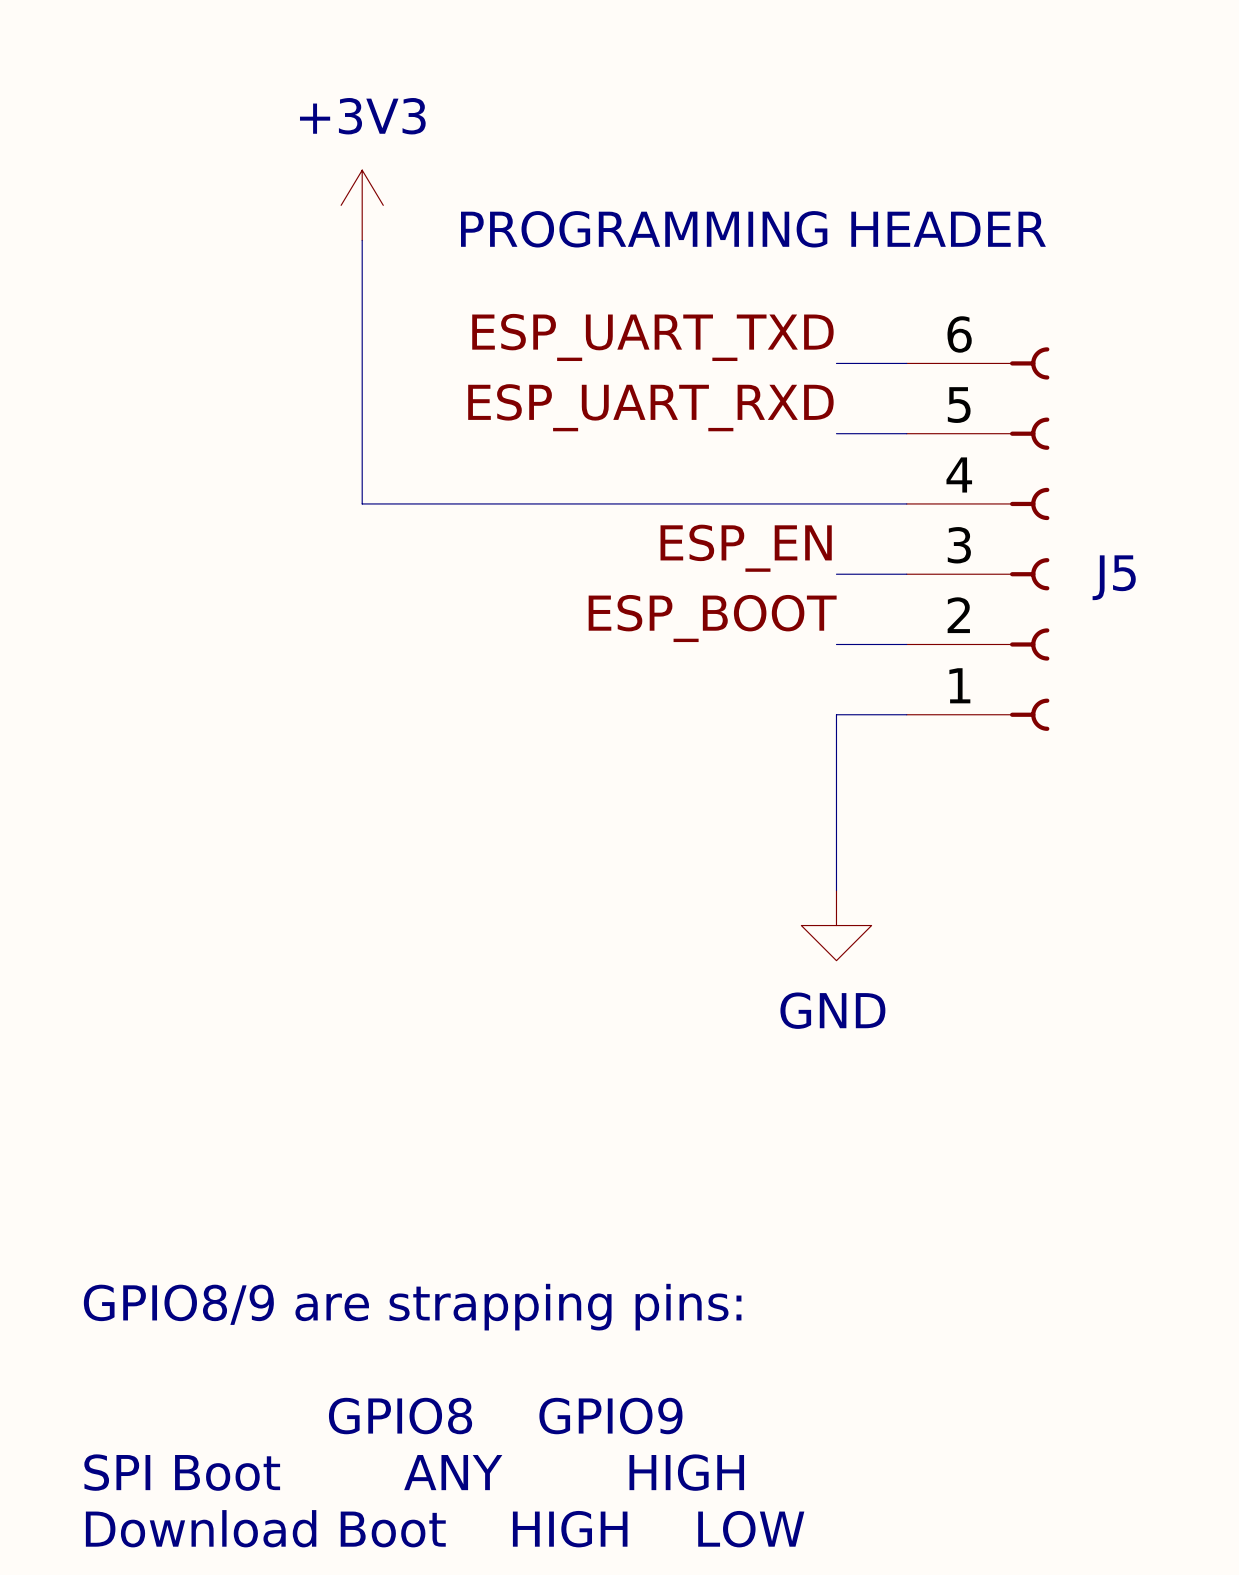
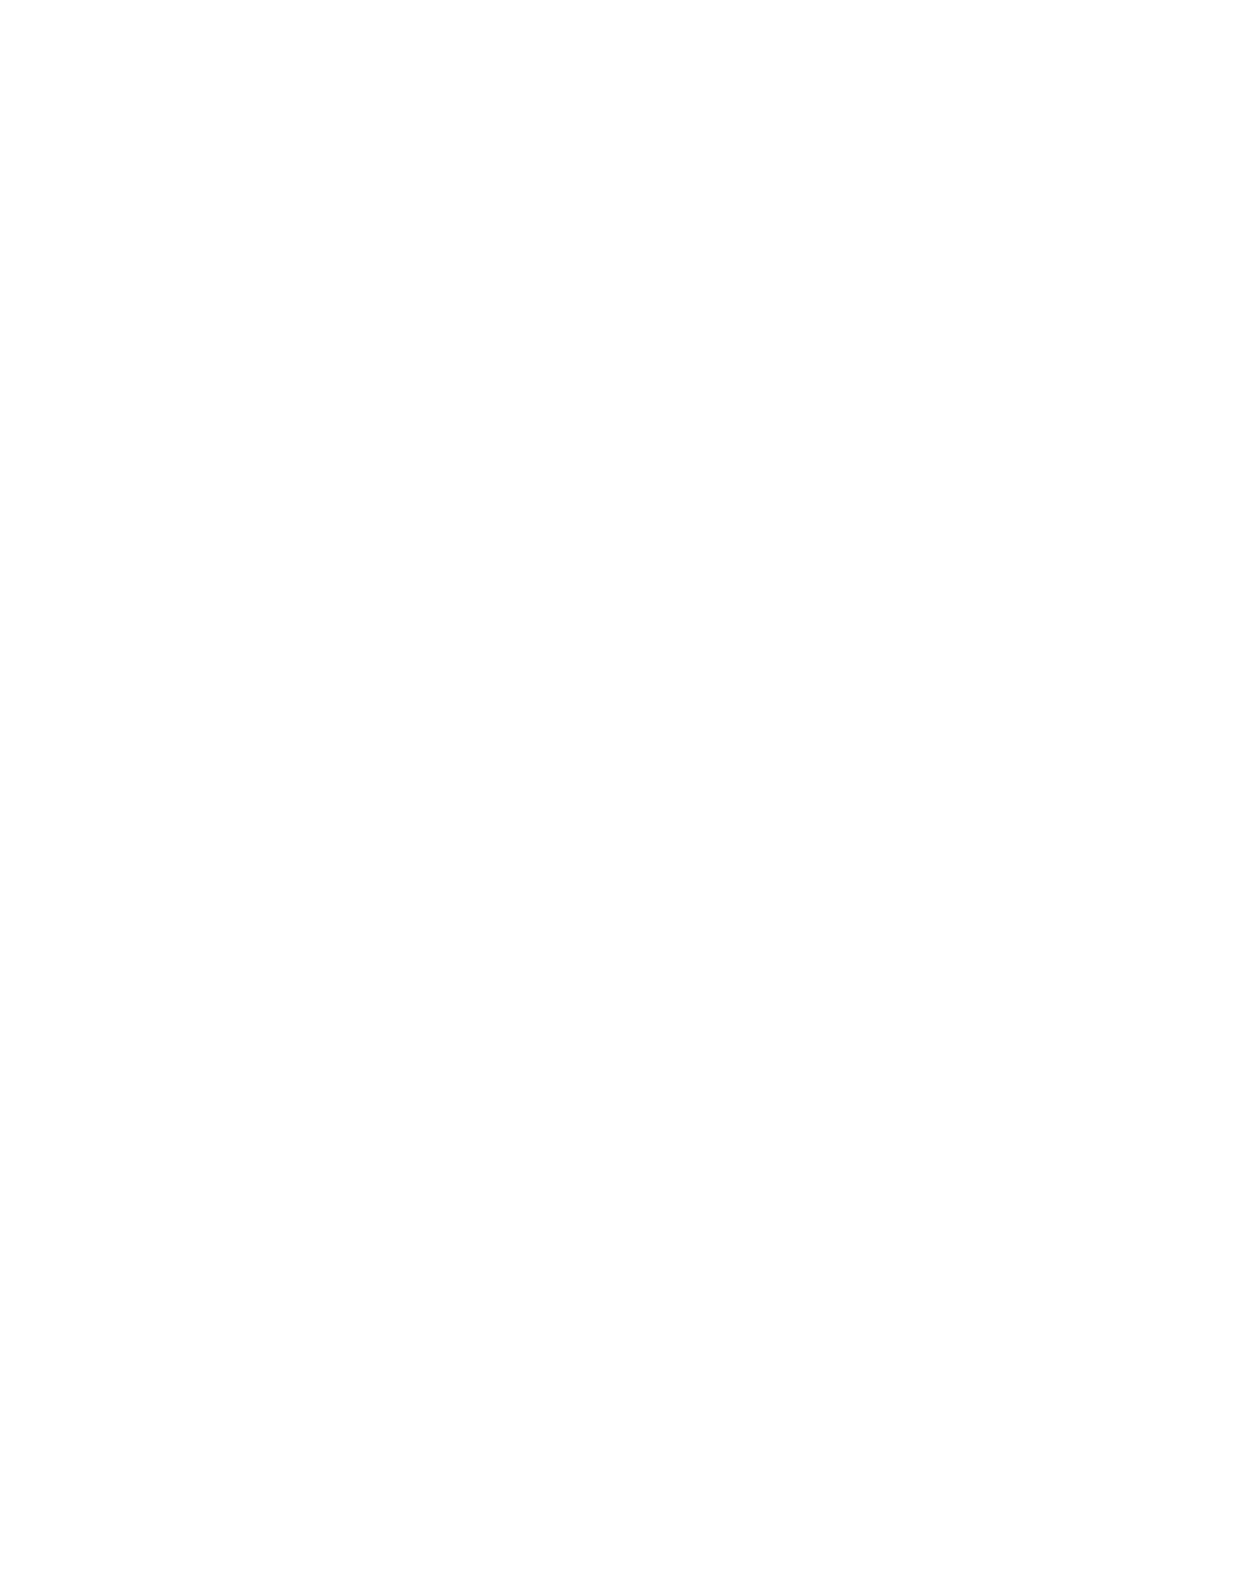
power symbol: +3V3 (362, 205) -> none
text: PROGRAMMING HEADER (753, 229) -> none
wire: (362, 240) (362, 503) (906, 503) -> none
label: ESP_UART_TXD (652, 337) -> none
wire: (836, 363) (906, 363) -> none
label: ESP_UART_RXD (650, 407) -> none
wire: (836, 433) (906, 433) -> none
J5: (978, 539) -> none
label: ESP_EN (746, 548) -> none
wire: (836, 574) (906, 574) -> none
label: ESP_BOOT (712, 618) -> none
wire: (836, 644) (906, 644) -> none
wire: (906, 714) (836, 714) (836, 890) -> none
power symbol: GND (836, 925) -> none
text: GPIO8/9 are strapping pins: (412, 1307) -> none
text: GPIO8 GPIO9 (505, 1416) -> none
text: SPI Boot ANY HIGH (414, 1472) -> none
text: Download Boot HIGH LOW (445, 1528) -> none

